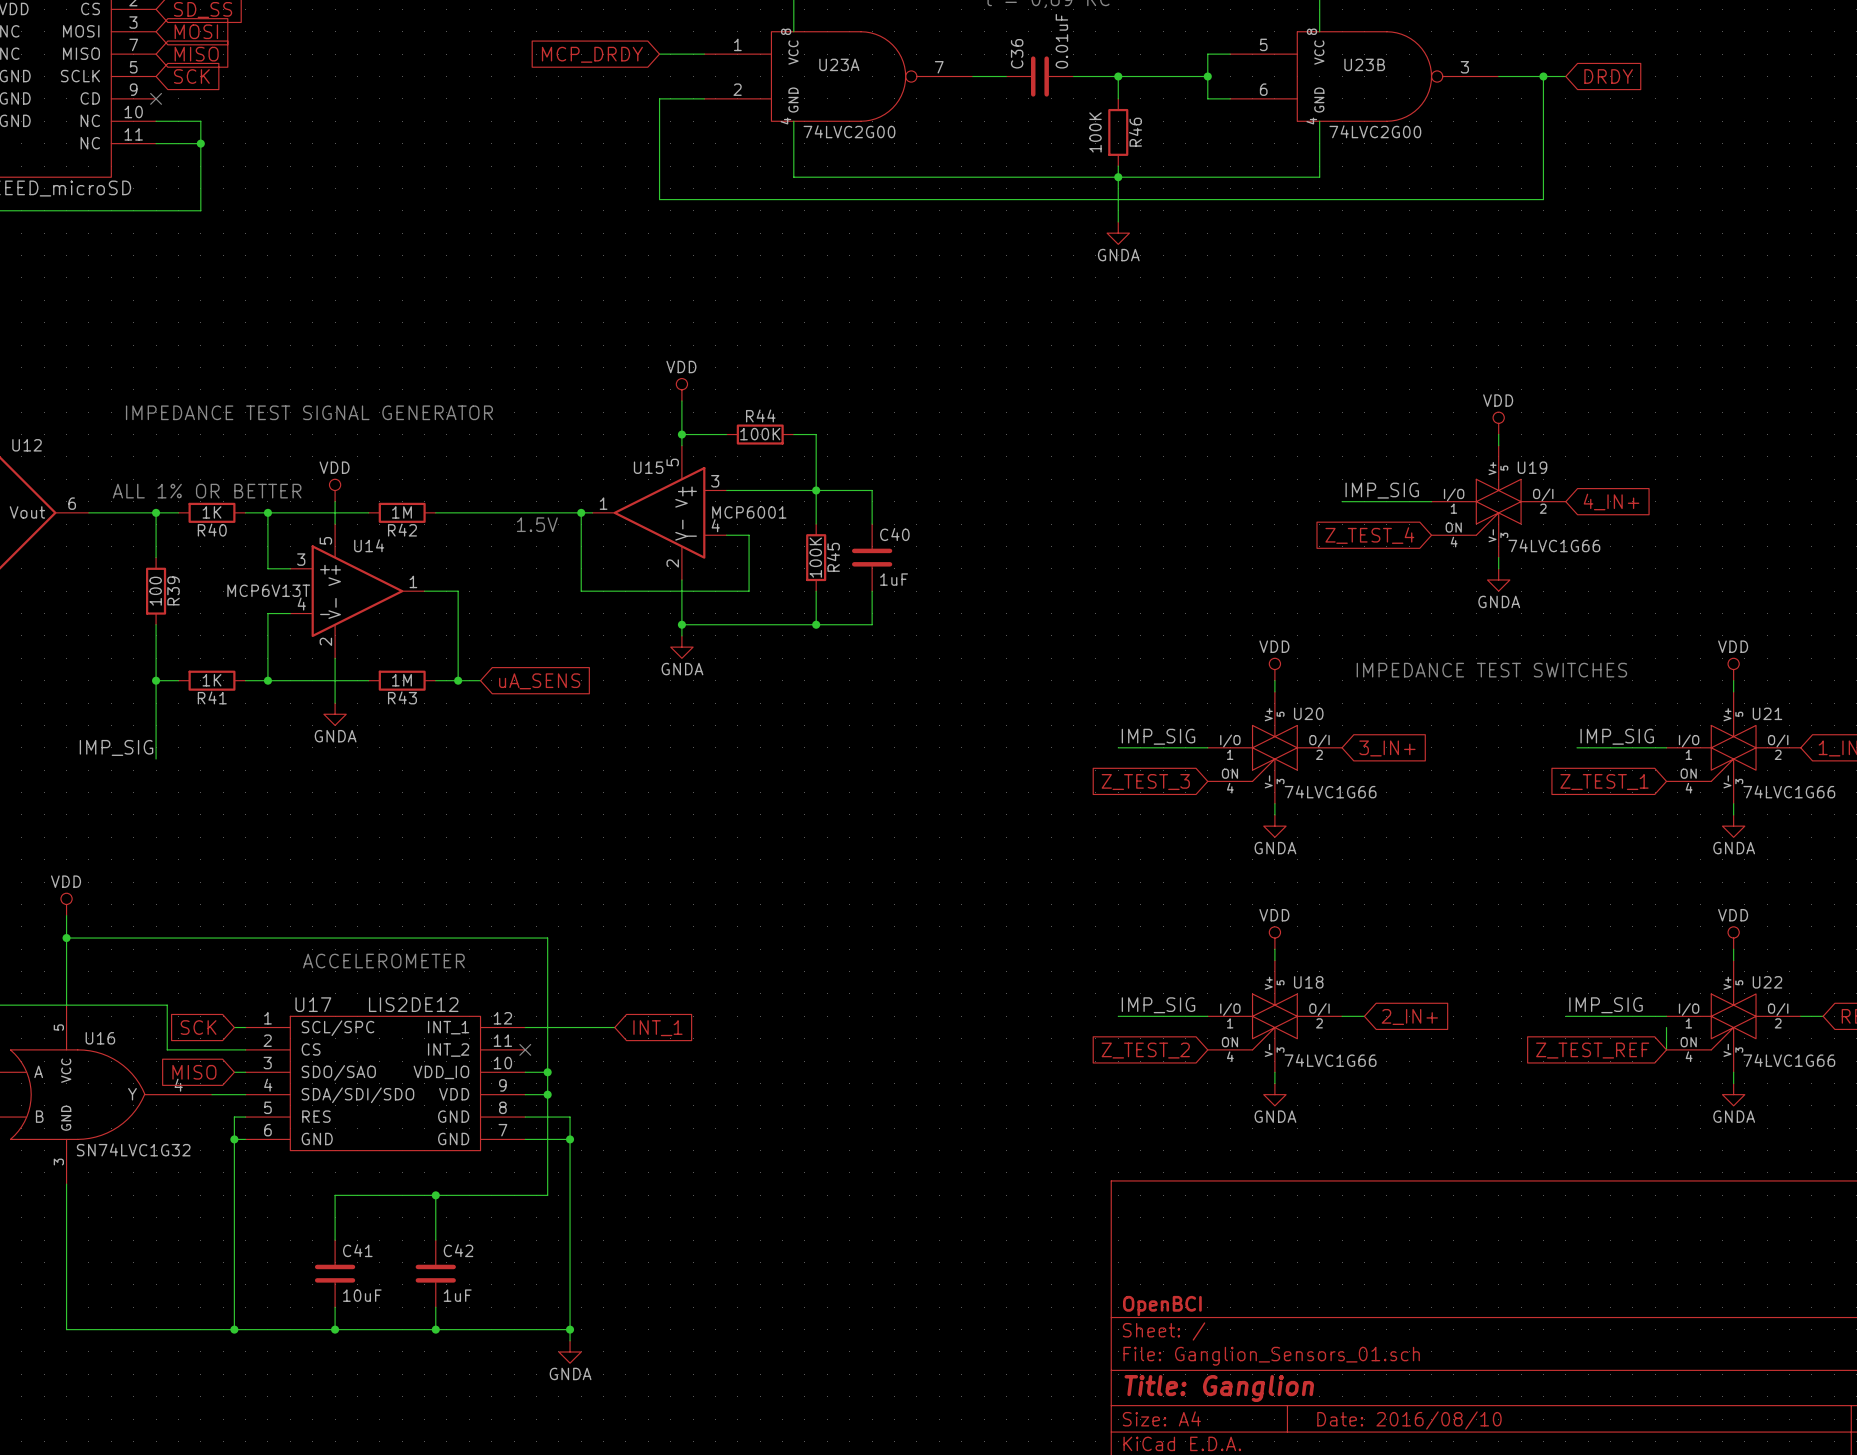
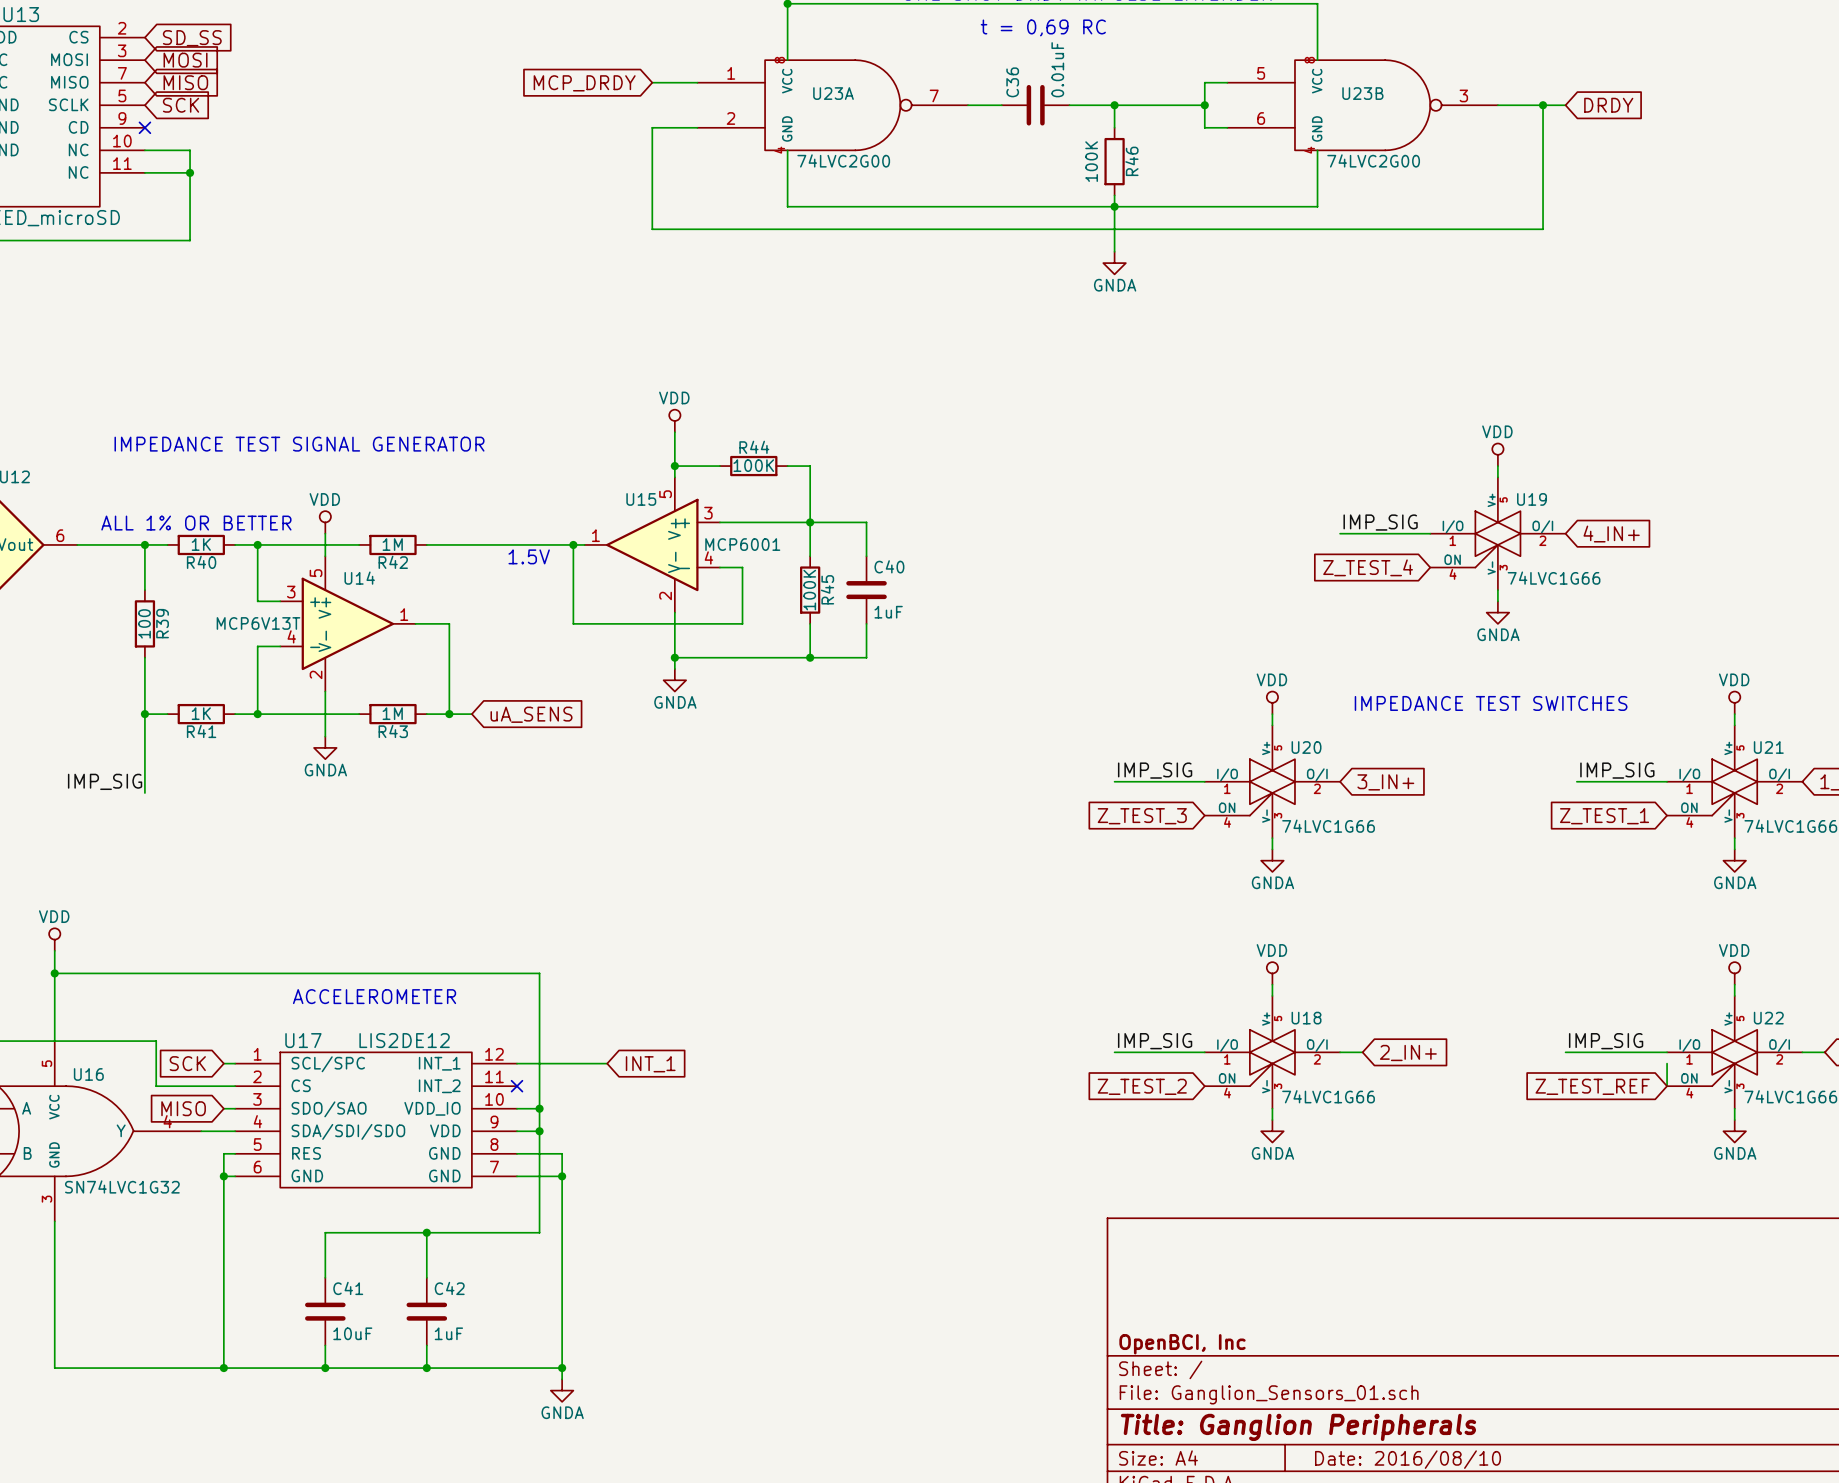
title block: OpenBCI (1162, 1306) -> OpenBCI, Inc (1182, 1344)
title block: Title: Ganglion (1219, 1388) -> Title: Ganglion Peripherals (1298, 1427)

